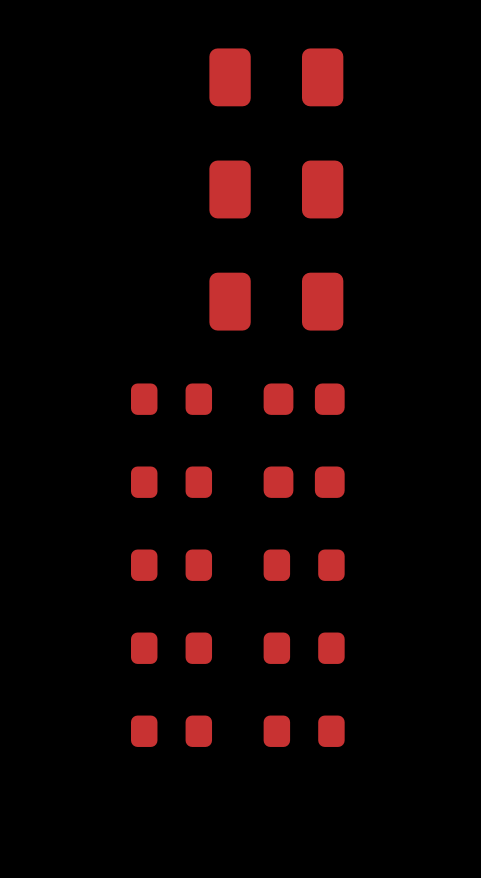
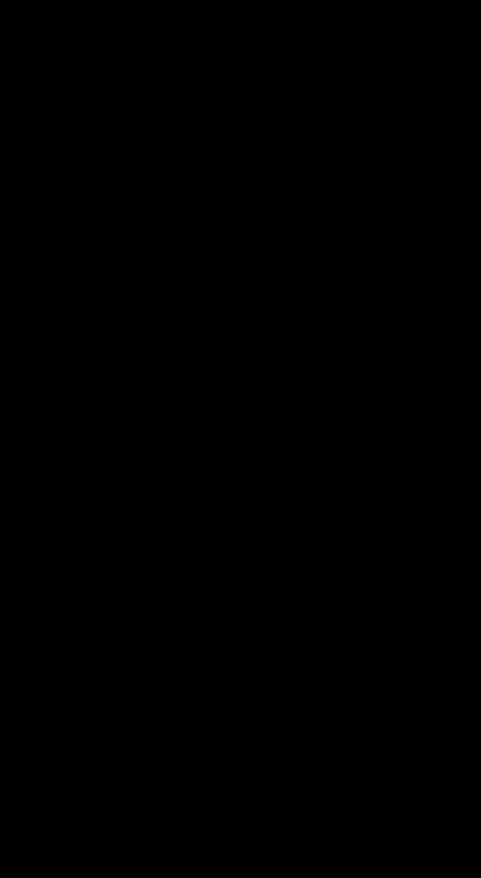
part: (276, 77) -> none
part: (276, 189) -> none
part: (276, 301) -> none
part: (171, 399) -> none
part: (304, 399) -> none
part: (171, 482) -> none
part: (304, 482) -> none
part: (171, 565) -> none
part: (304, 565) -> none
part: (171, 648) -> none
part: (304, 648) -> none
part: (171, 731) -> none
part: (304, 731) -> none

